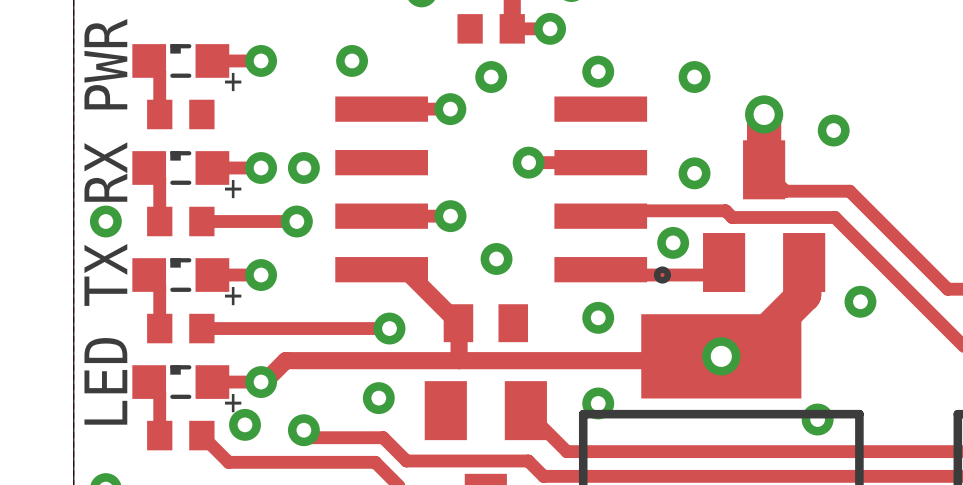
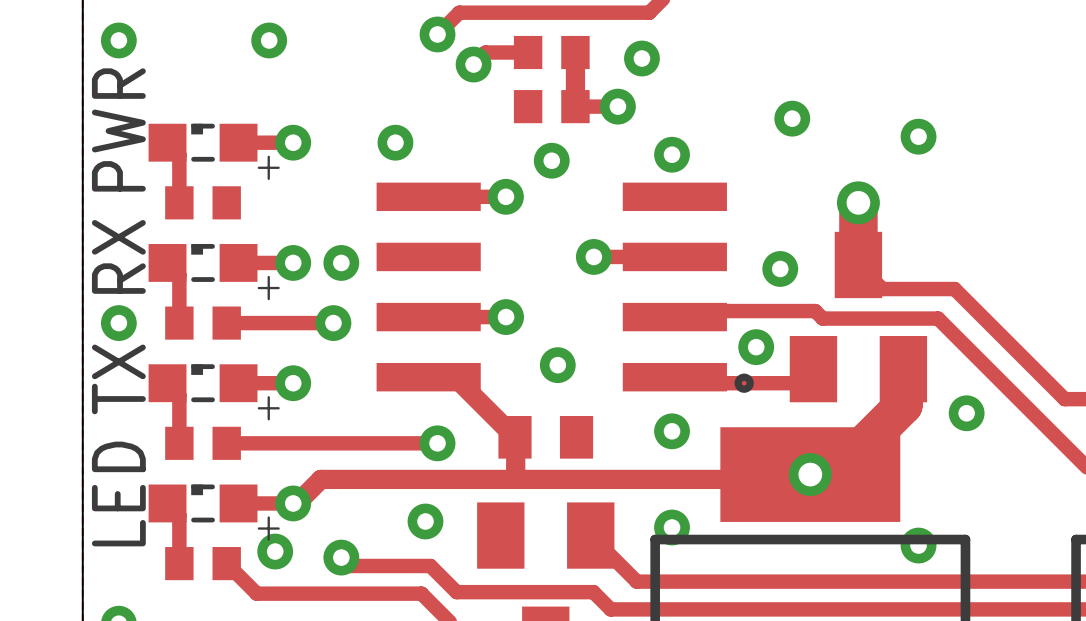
via: none -> (918, 136)
via position: (694, 77) -> (792, 118)
via: (833, 130) -> none

